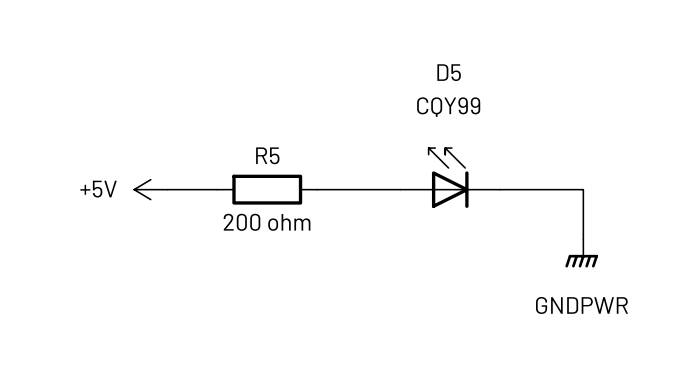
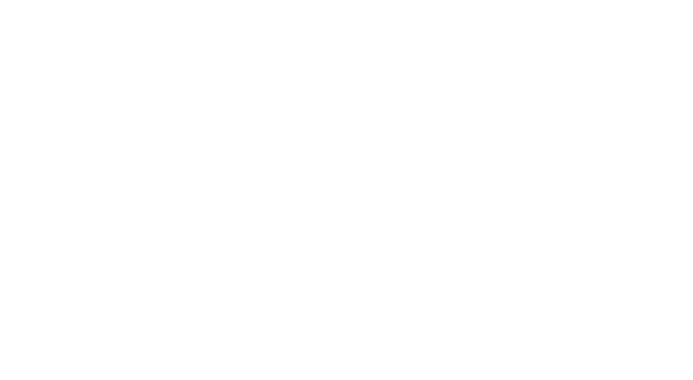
D5: CQY99 (450, 178) -> none
power symbol: +5V (150, 189) -> none
wire: (167, 189) (217, 189) -> none
R5: 200 ohm (267, 189) -> none
wire: (317, 189) (400, 189) -> none
wire: (500, 189) (583, 189) (583, 239) -> none
power symbol: GNDPWR (581, 253) -> none

